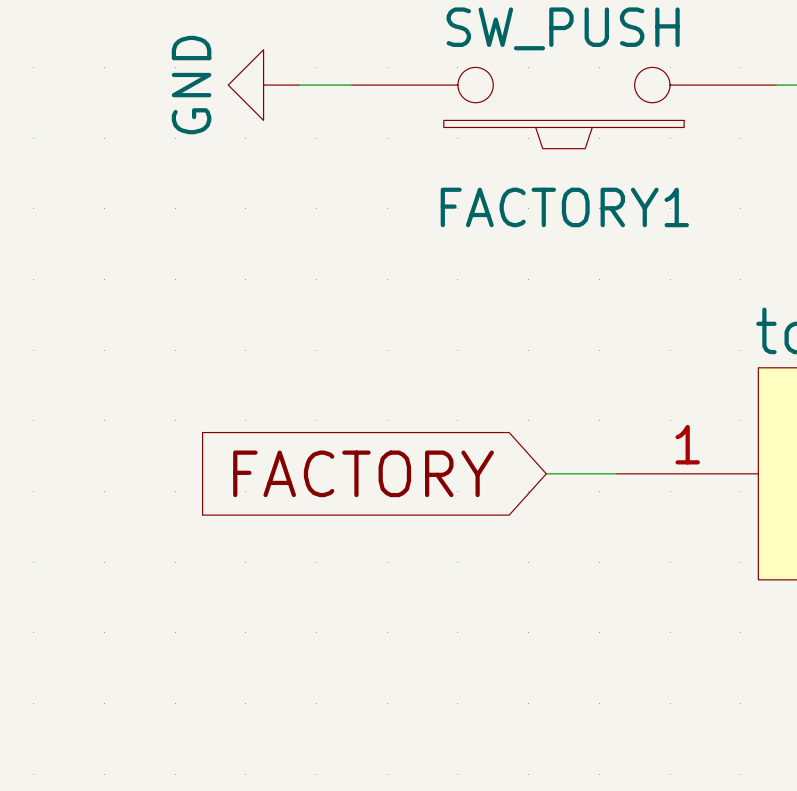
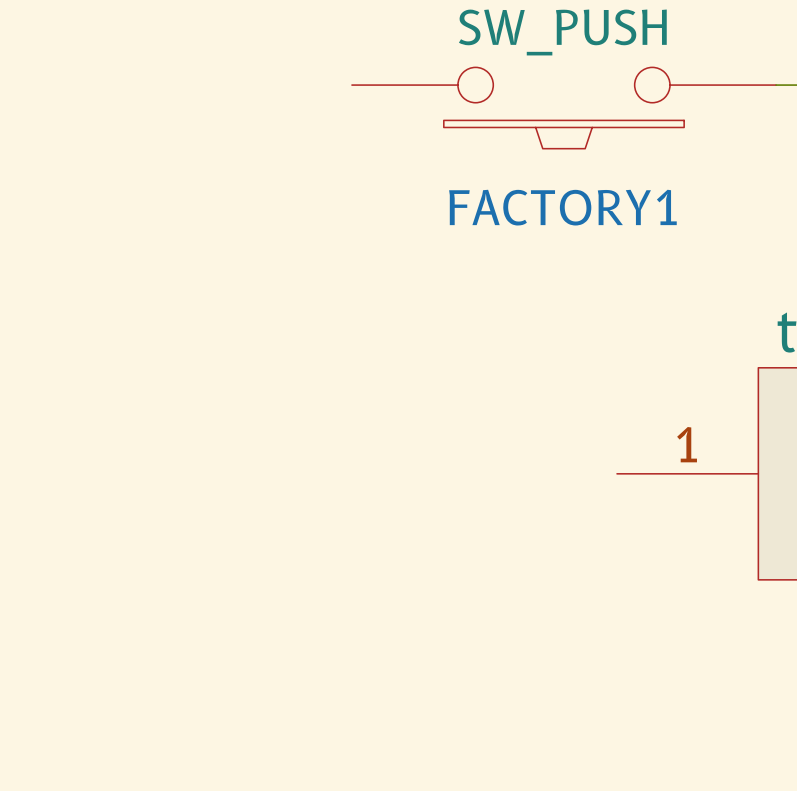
power symbol: GND (263, 85) -> none
wire: (298, 85) (351, 85) -> none
global label: FACTORY (363, 473) -> none
wire: (546, 473) (616, 473) -> none

